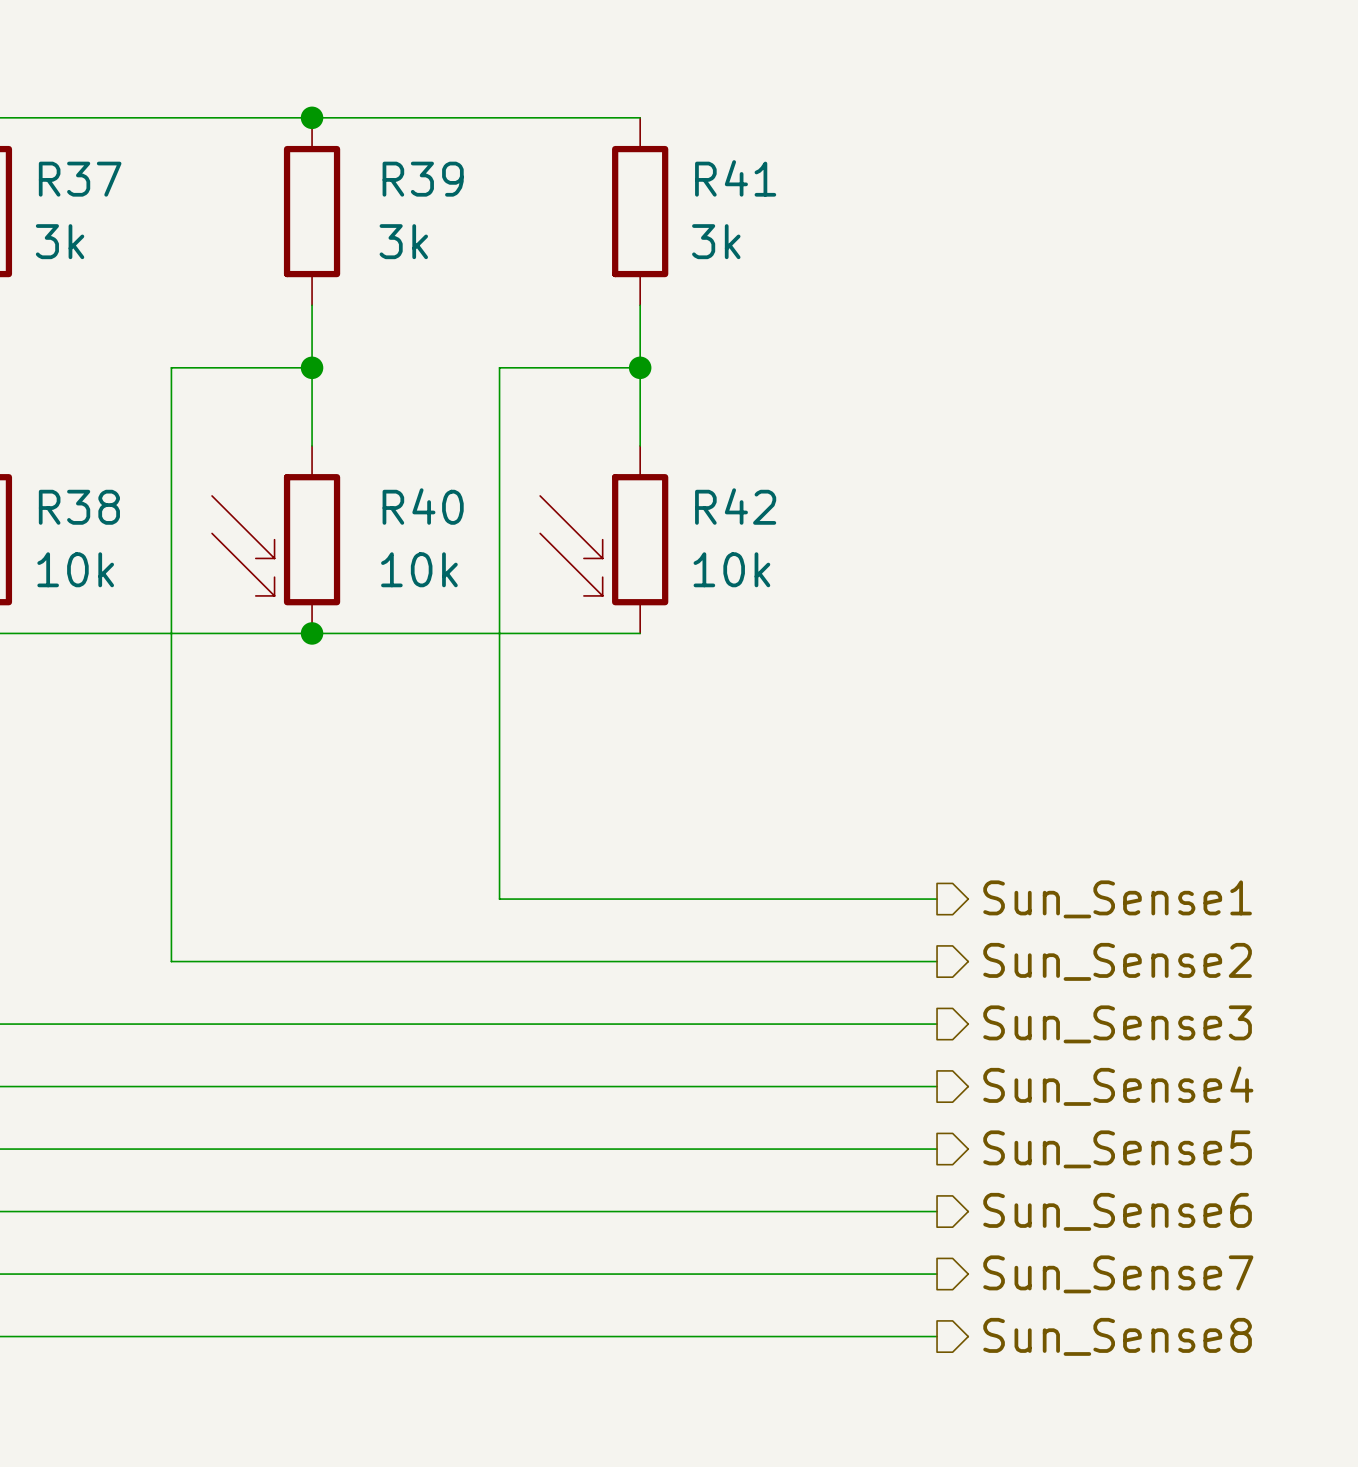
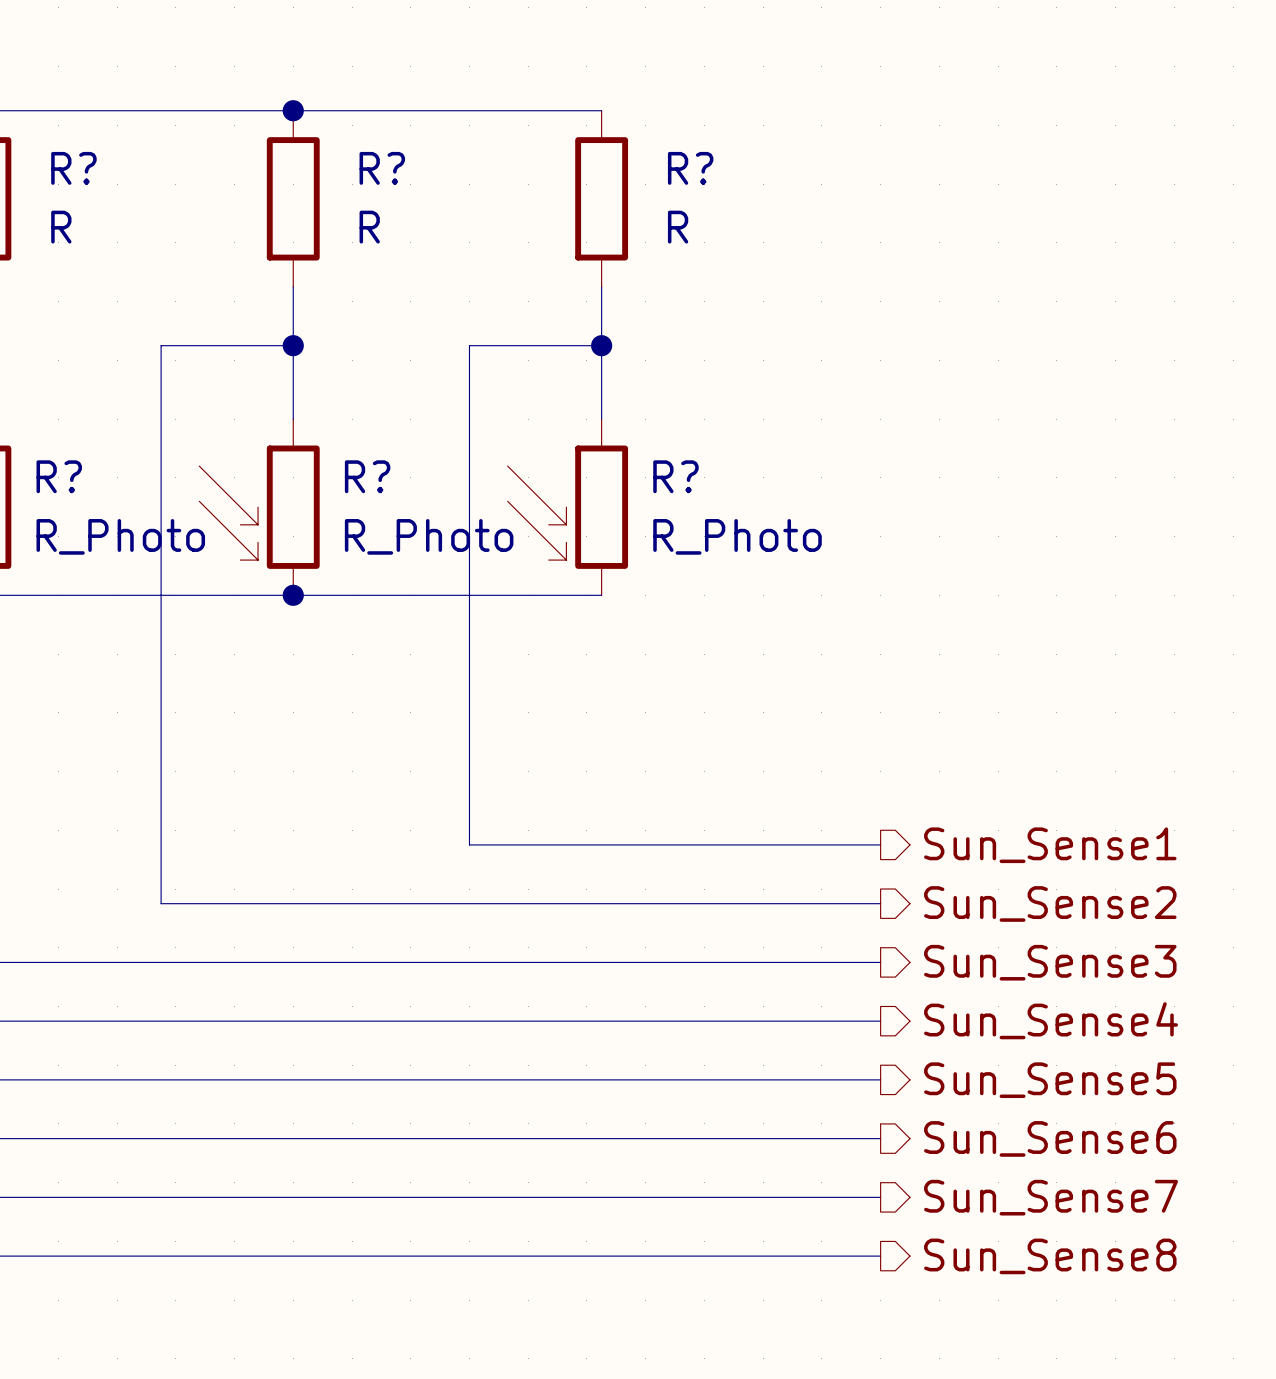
R41 name: R41 (735, 178) -> R? (690, 168)
R37 name: R37 (80, 179) -> R? (73, 168)
R39 name: R39 (423, 179) -> R? (382, 168)
R37 value: 3k (60, 241) -> R (61, 227)
R39 value: 3k (403, 241) -> R (369, 227)
R41 value: 3k (716, 241) -> R (678, 227)
R40 name: R40 (423, 506) -> R? (367, 476)
R42 name: R42 (735, 506) -> R? (675, 476)
R38 name: R38 (79, 507) -> R? (59, 476)
R38 value: 10k (75, 569) -> R_Photo (120, 536)
R40 value: 10k (419, 569) -> R_Photo (429, 536)
R42 value: 10k (731, 569) -> R_Photo (737, 536)

